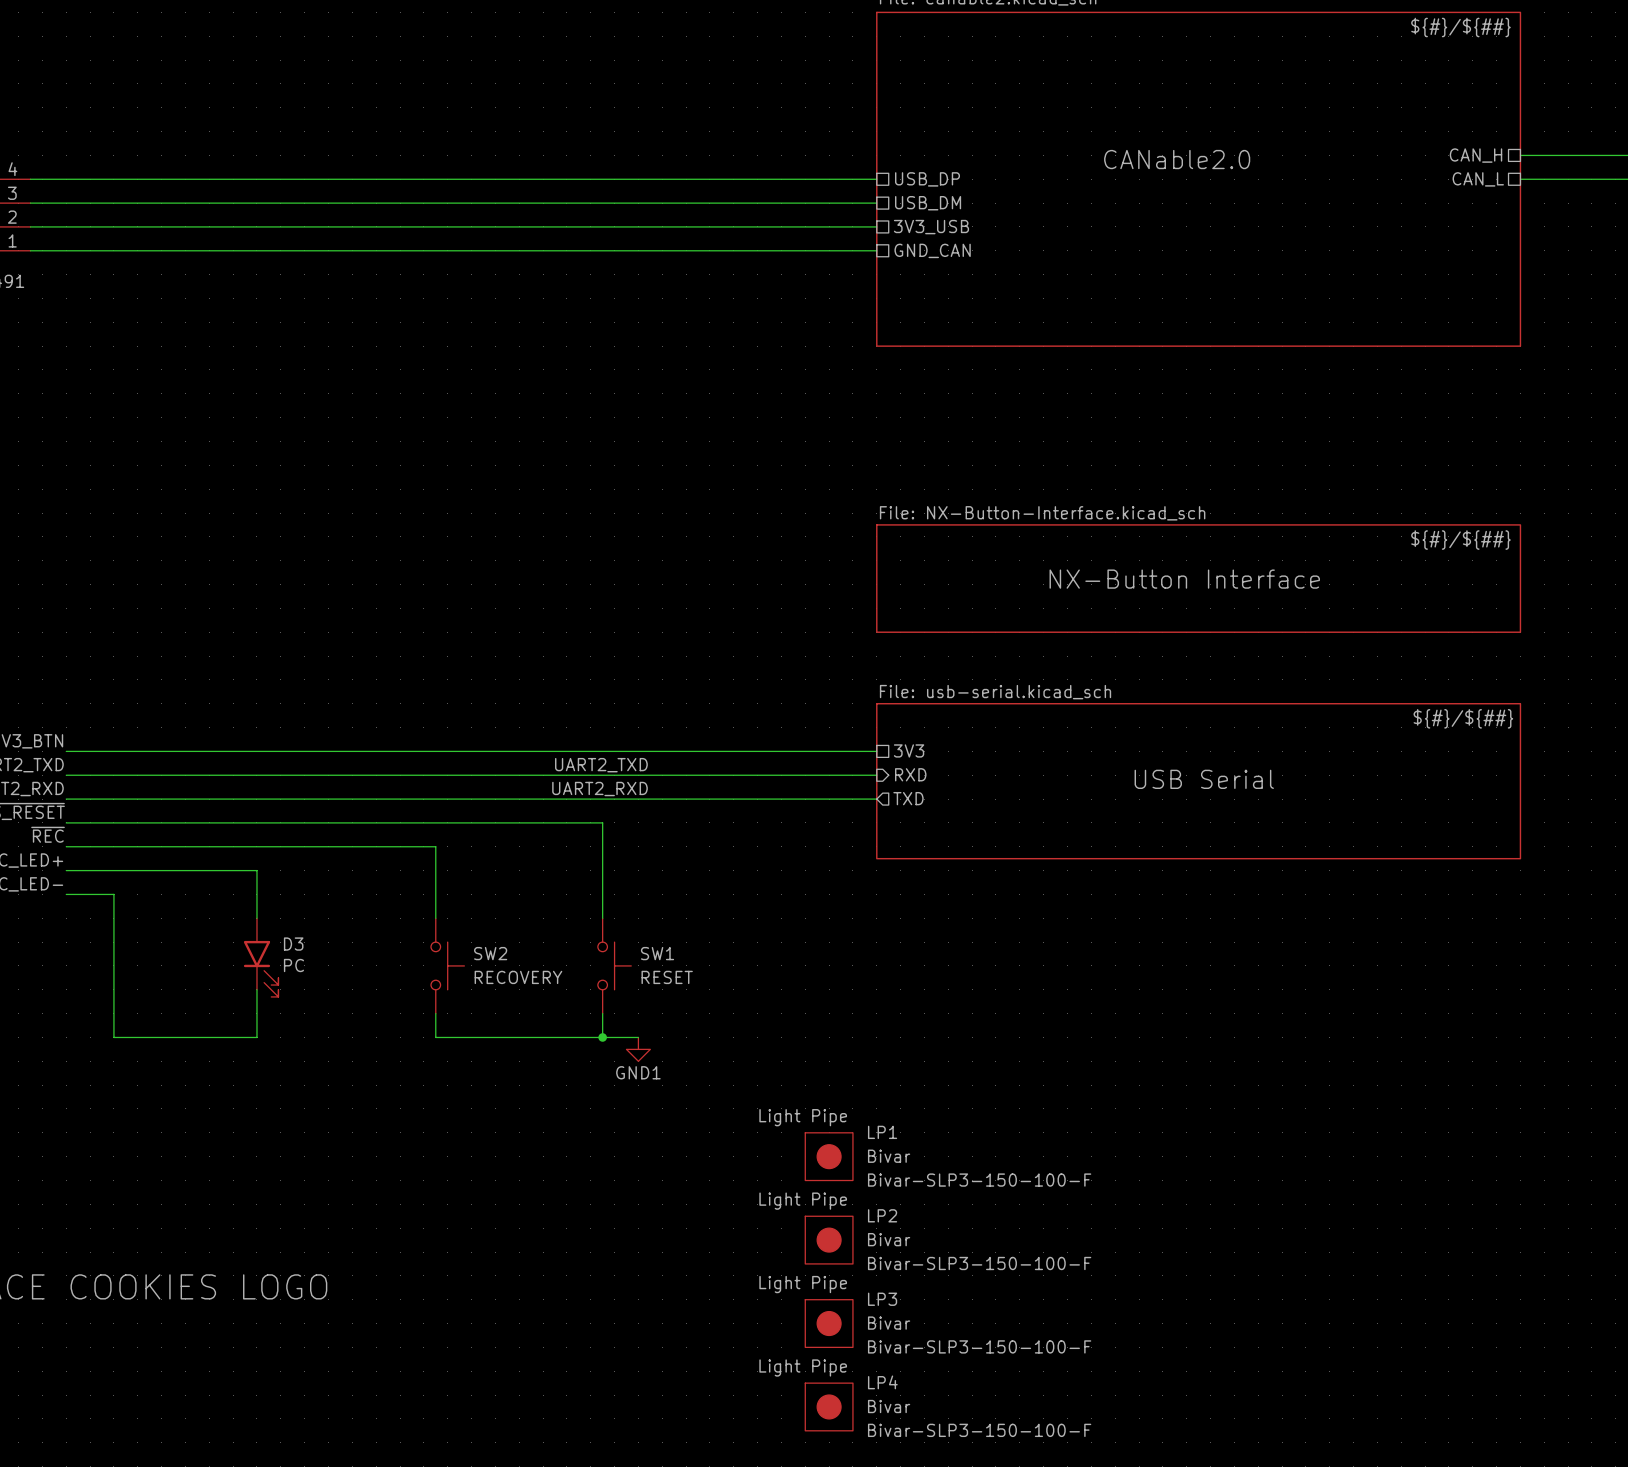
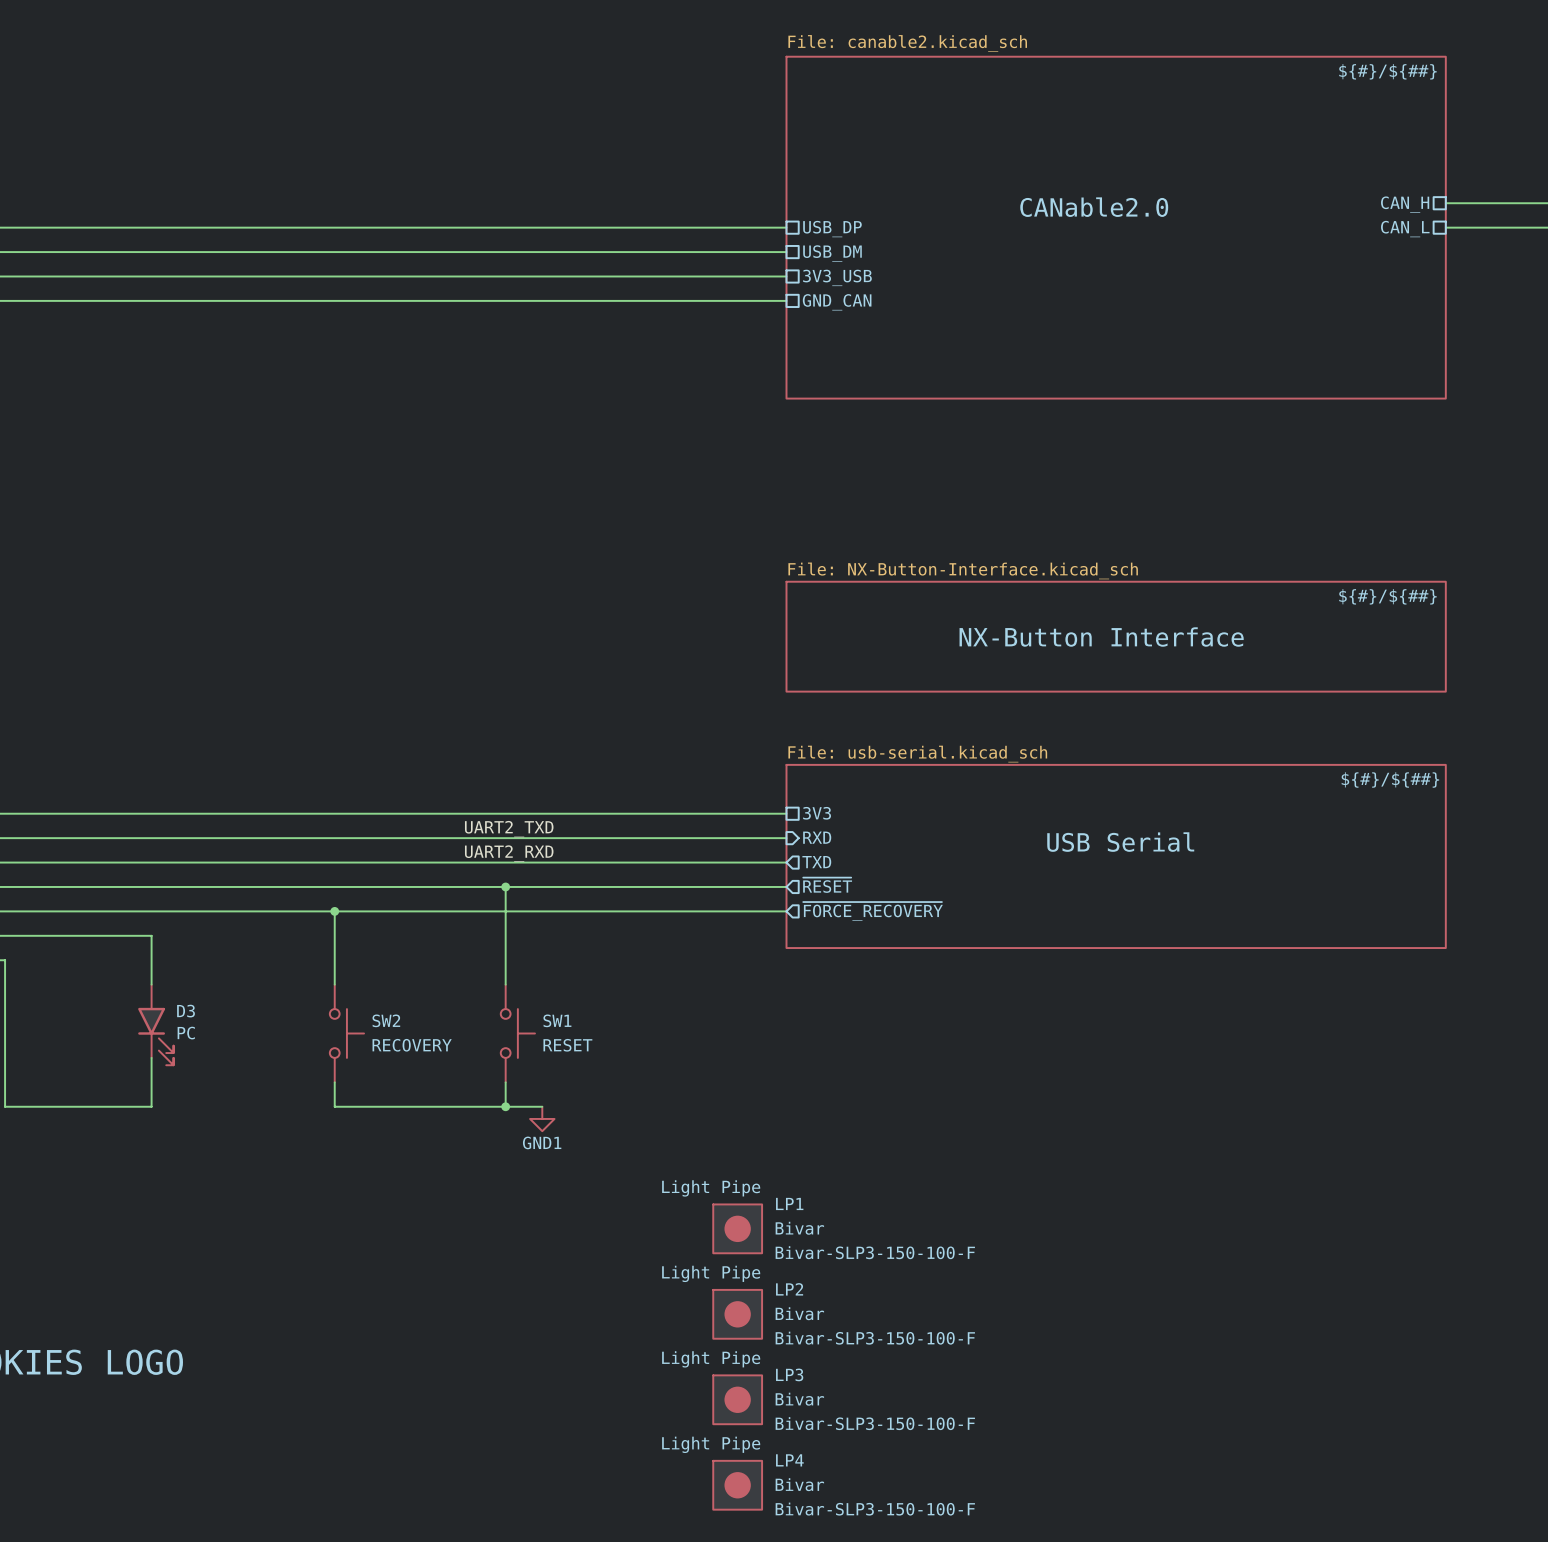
sheet USB Serial: File: usb-serial.kicad_sch (1198, 781) -> none
sheet USB Serial: none -> File: usb-serial.kicad_sch (1116, 856)
sheet pin: none -> ~{RESET} (827, 885)
wire: none -> (505, 886) (786, 886)
junction: none -> (505, 886)
sheet pin: none -> ~{FORCE_RECOVERY} (873, 911)
wire: none -> (334, 911) (786, 911)
junction: none -> (334, 911)

